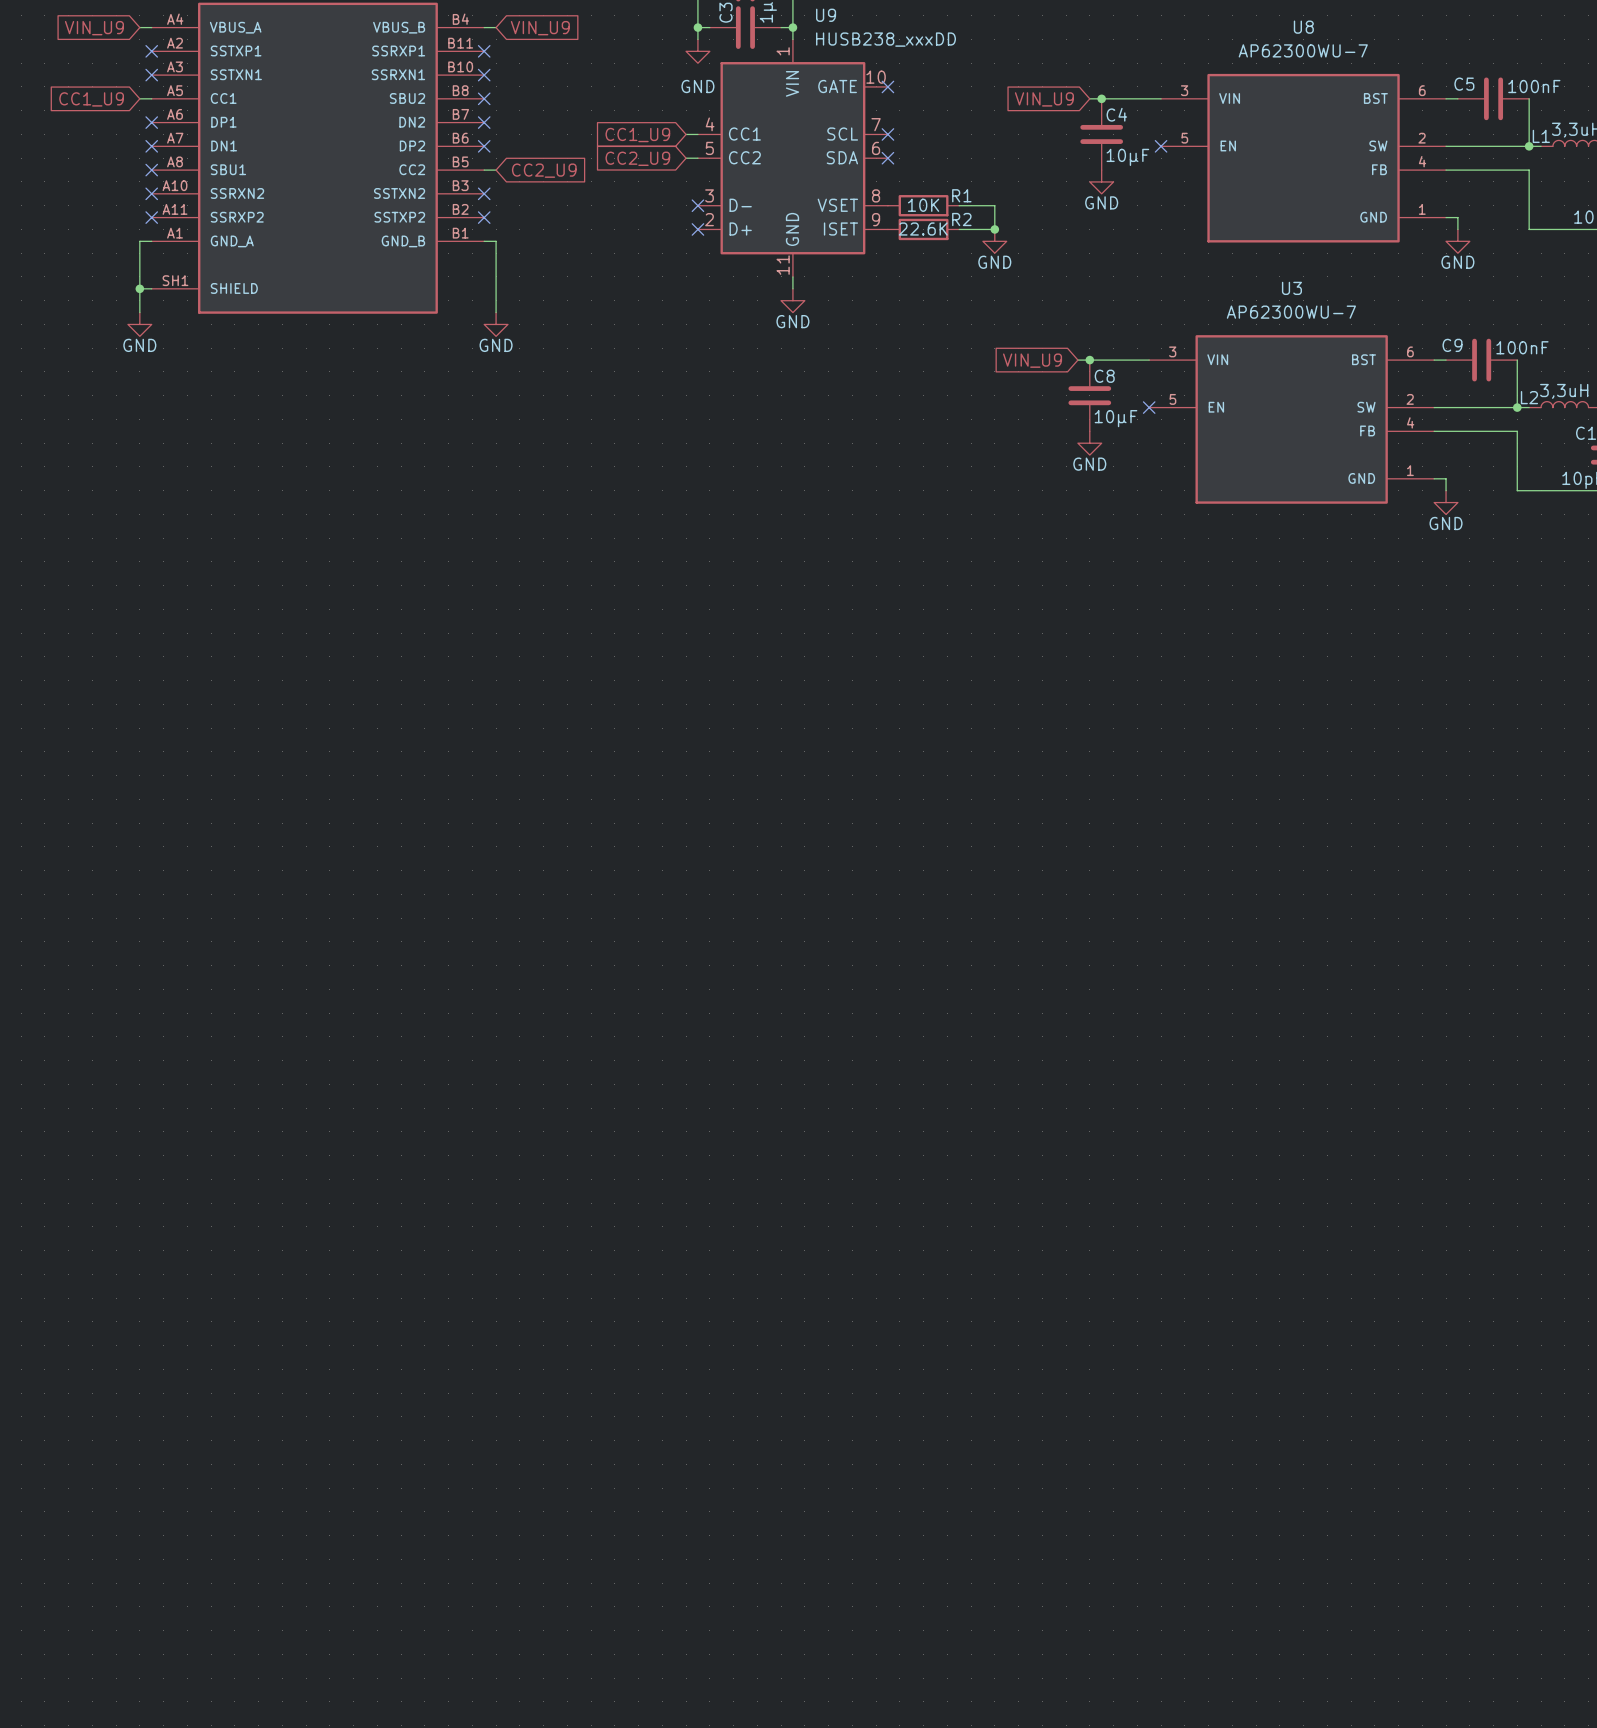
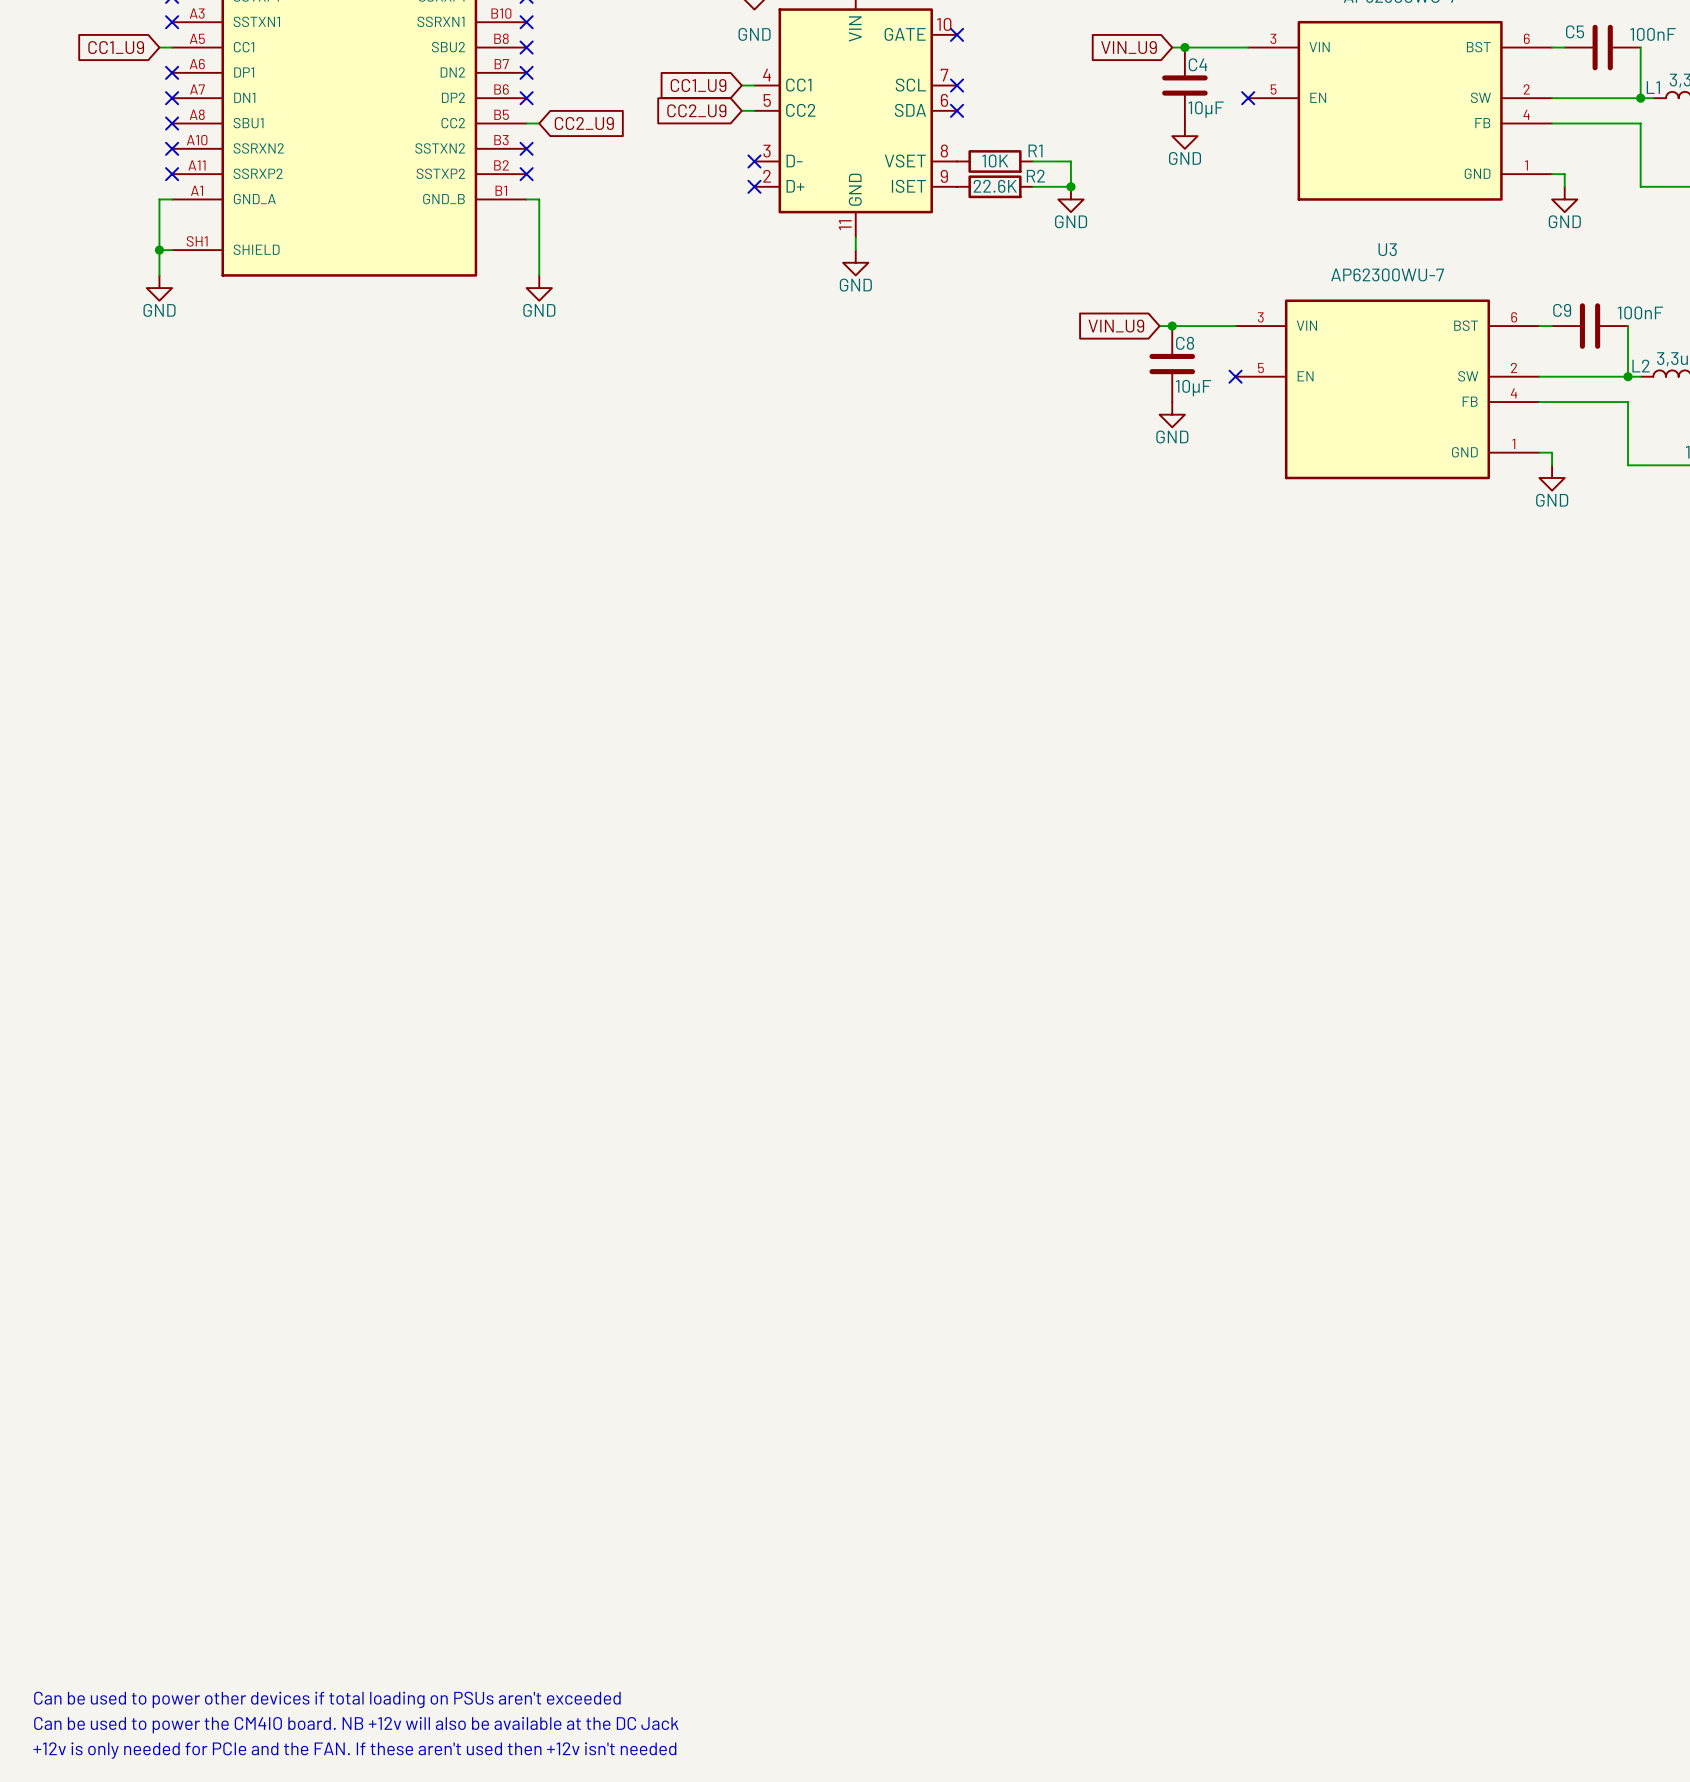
text: none -> Can be used to power other devices if total loading on PSUs aren't exceeded (327, 1699)
text: none -> Can be used to power the CM4IO board. NB +12v will also be available at the DC Jack (356, 1725)
text: none -> +12v is only needed for PCIe and the FAN. If these aren't used then +12v isn't needed (354, 1750)

